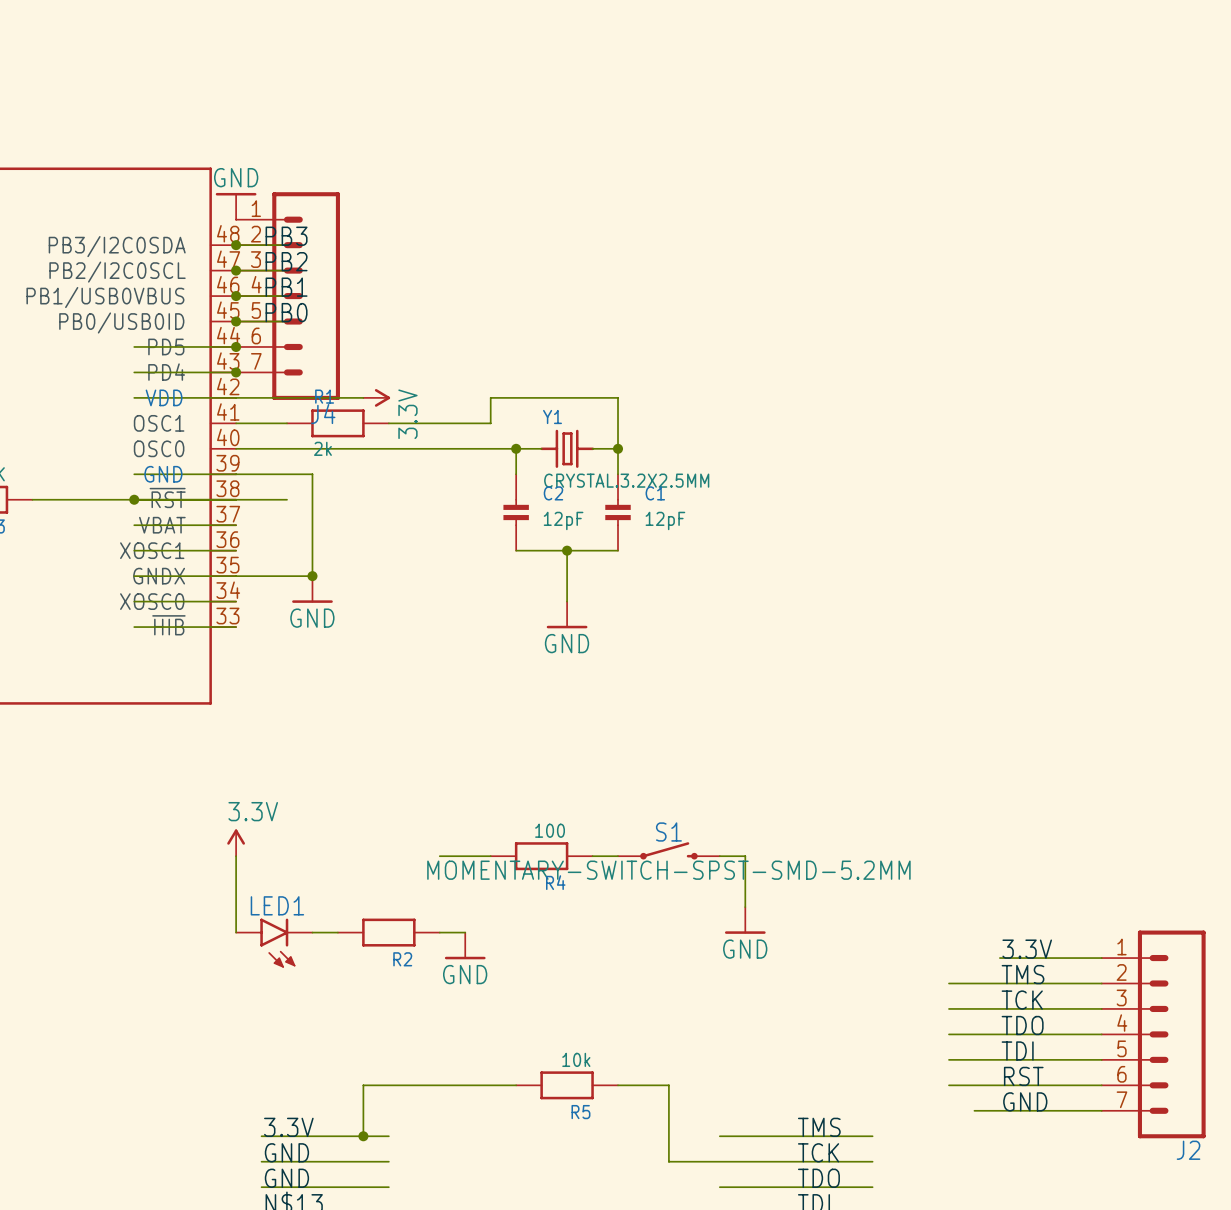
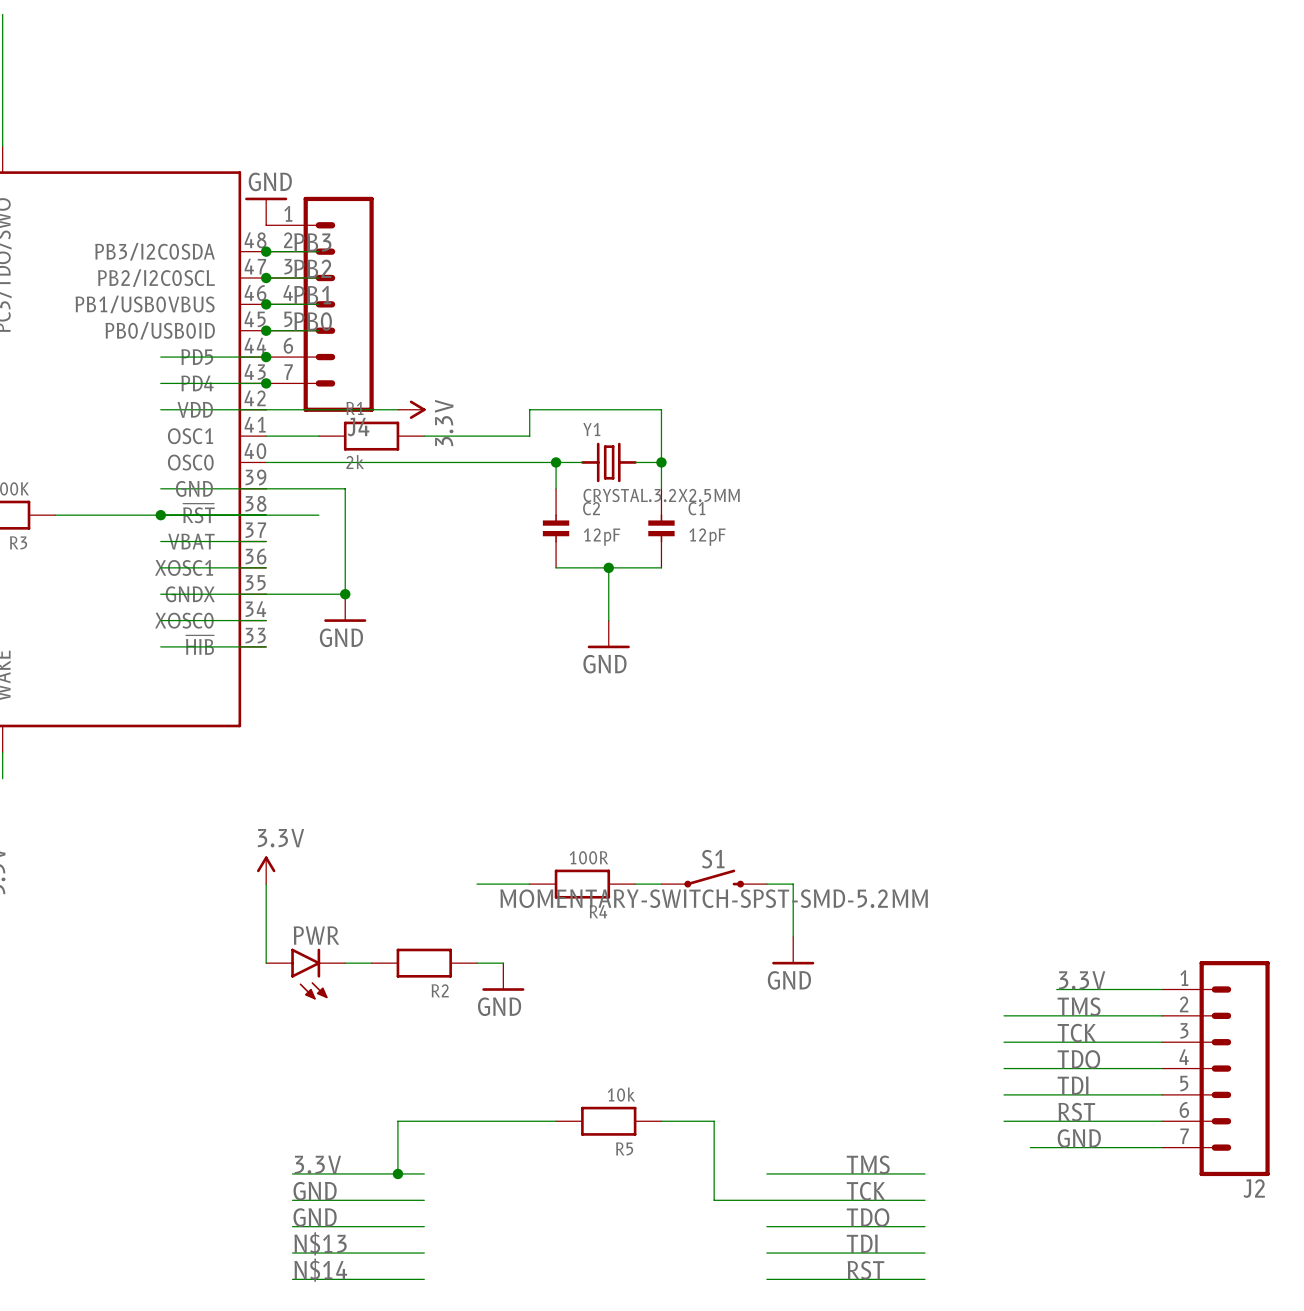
R4 value: 100 (550, 830) -> 100R (588, 857)
LED1 name: LED1 (277, 905) -> PWR (316, 935)

